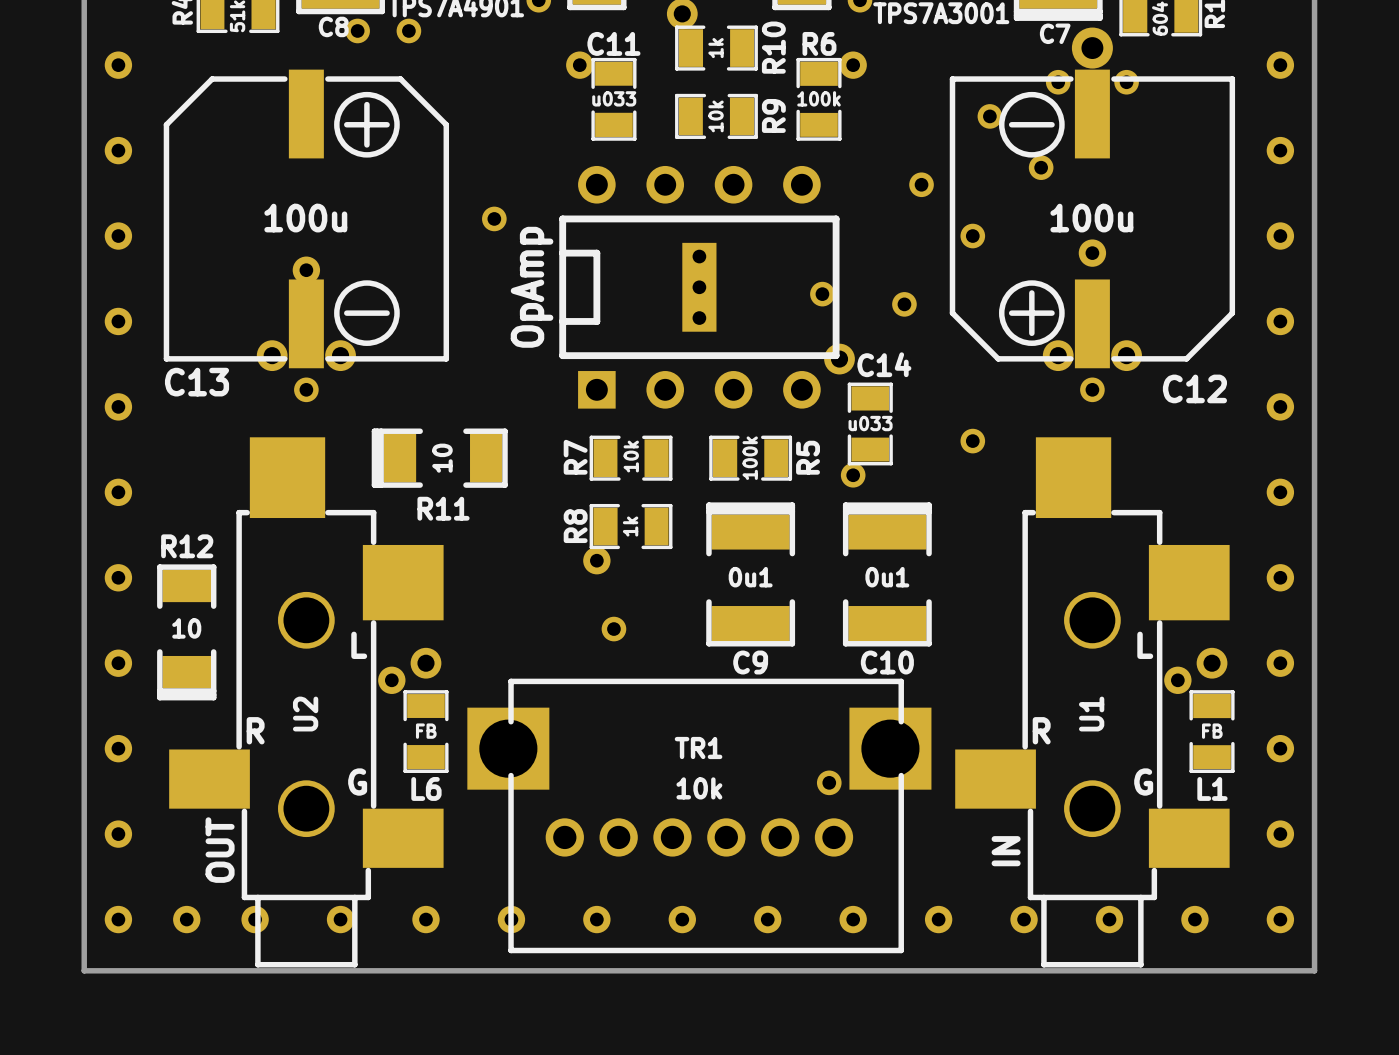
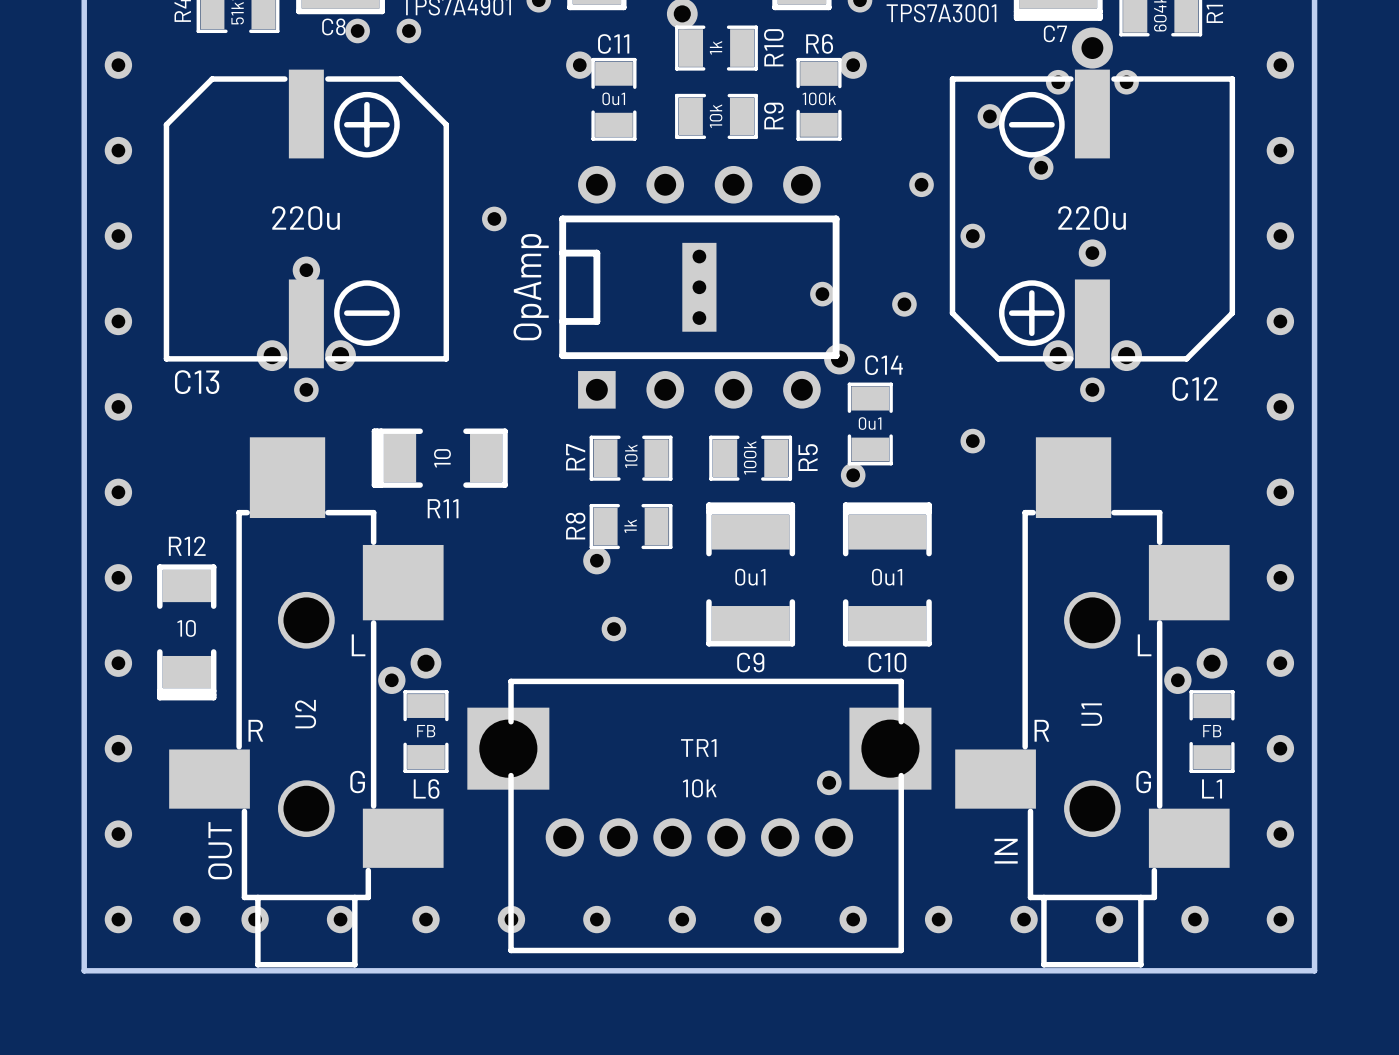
C11 value: u033 (614, 98) -> 0u1 (613, 98)
C13 value: 100u (305, 218) -> 220u (306, 218)
C12 value: 100u (1091, 218) -> 220u (1092, 218)
C14 value: u033 (870, 423) -> 0u1 (870, 423)

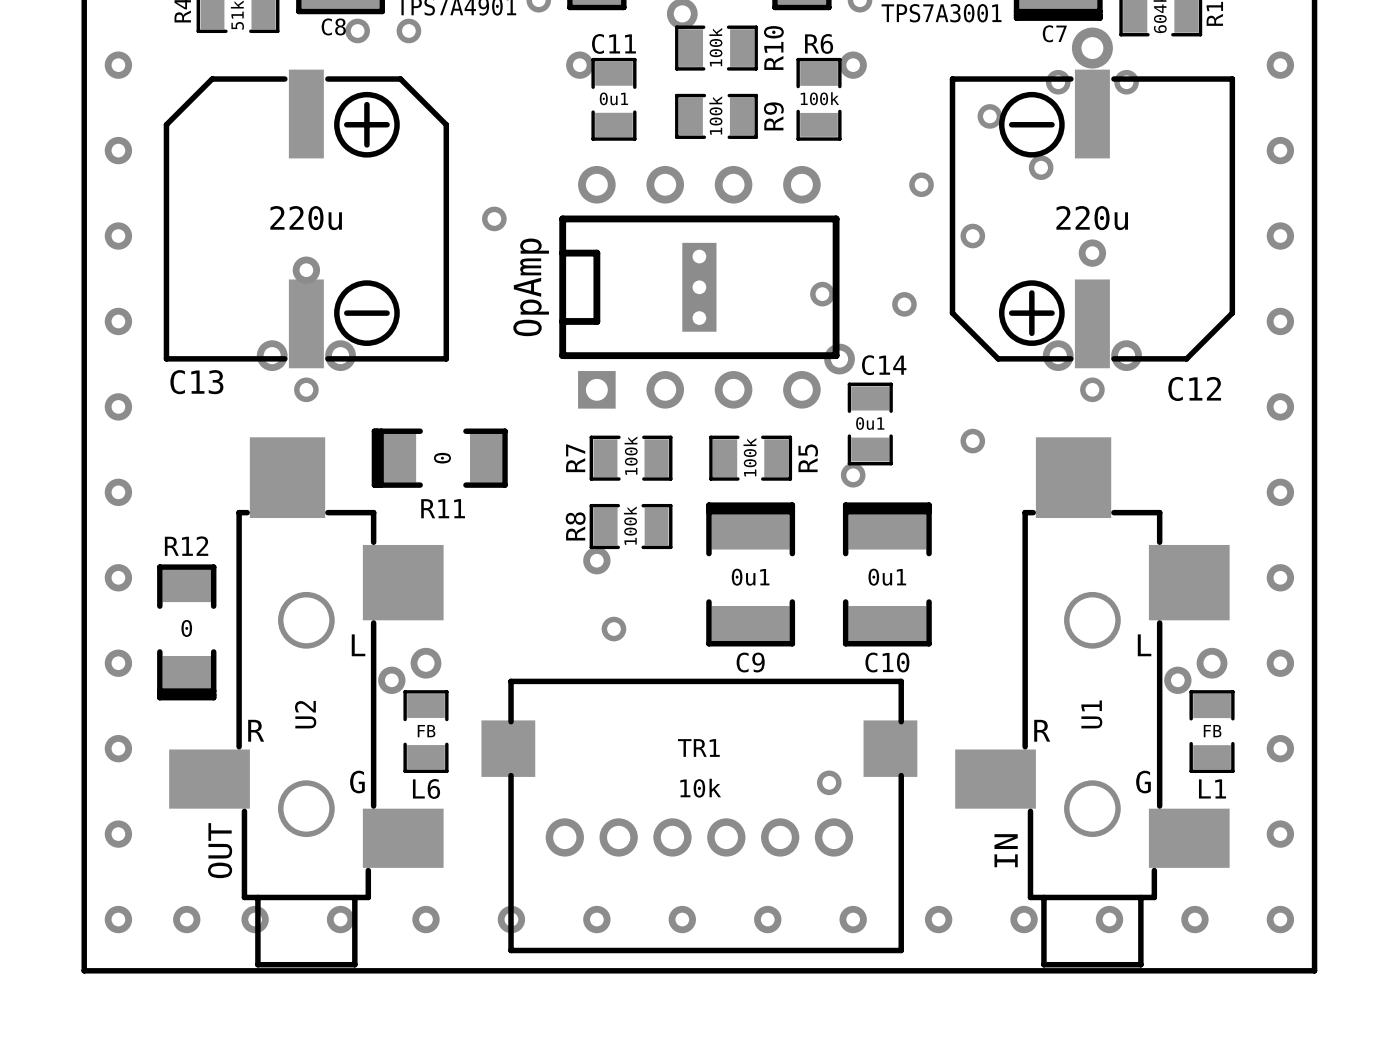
R10 value: 1k (716, 47) -> 100k (715, 47)
R9 value: 10k (716, 116) -> 100k (715, 115)
R7 value: 10k (631, 456) -> 100k (631, 455)
R11 value: 10 (442, 458) -> 0 (442, 458)
R8 value: 1k (630, 526) -> 100k (630, 525)
R12 value: 10 (186, 628) -> 0 (186, 628)
TR1 footprint: [467, 678, 932, 954] -> [481, 678, 918, 954]

